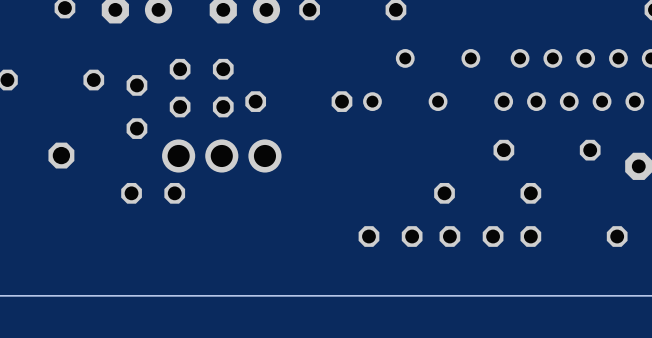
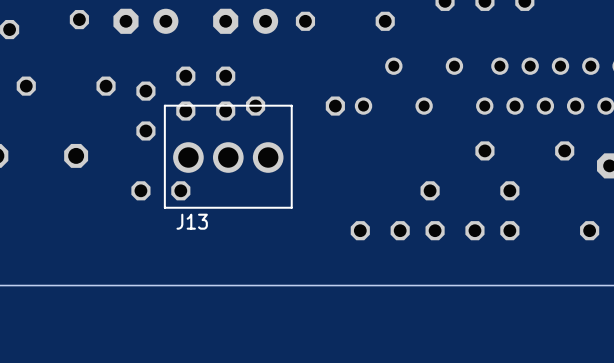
part: (221, 155) -> none
J13: none -> (228, 156)

